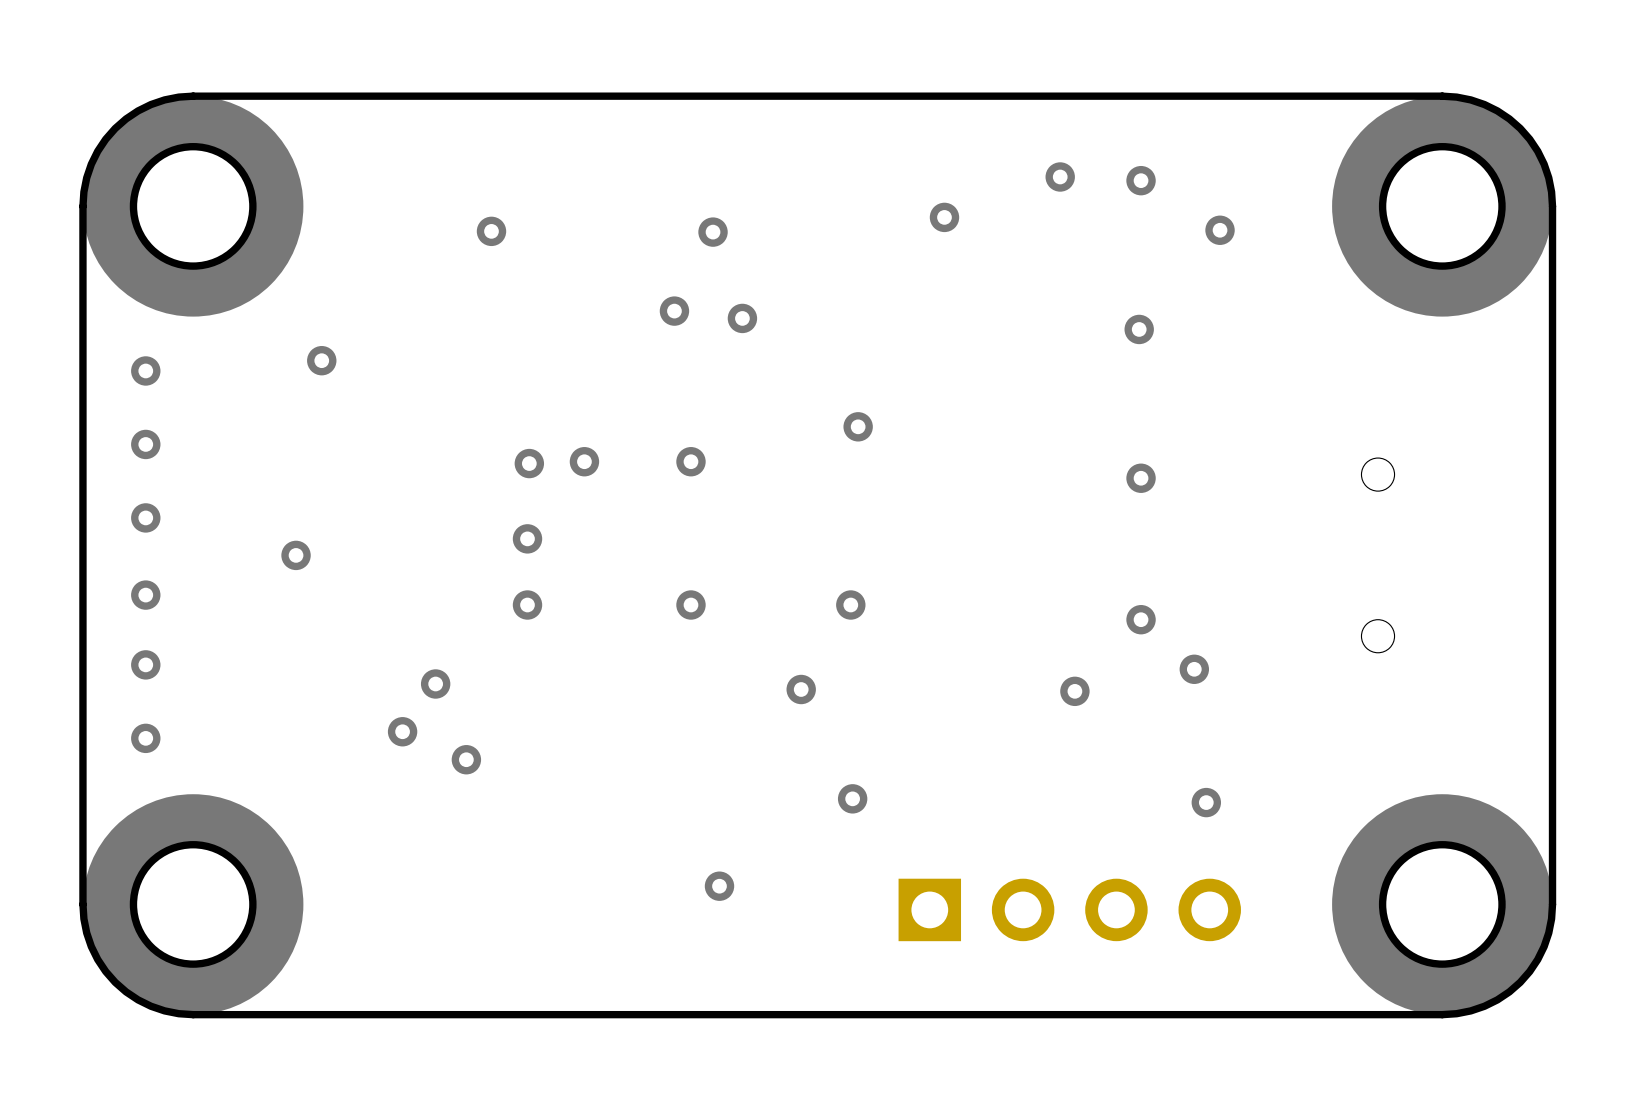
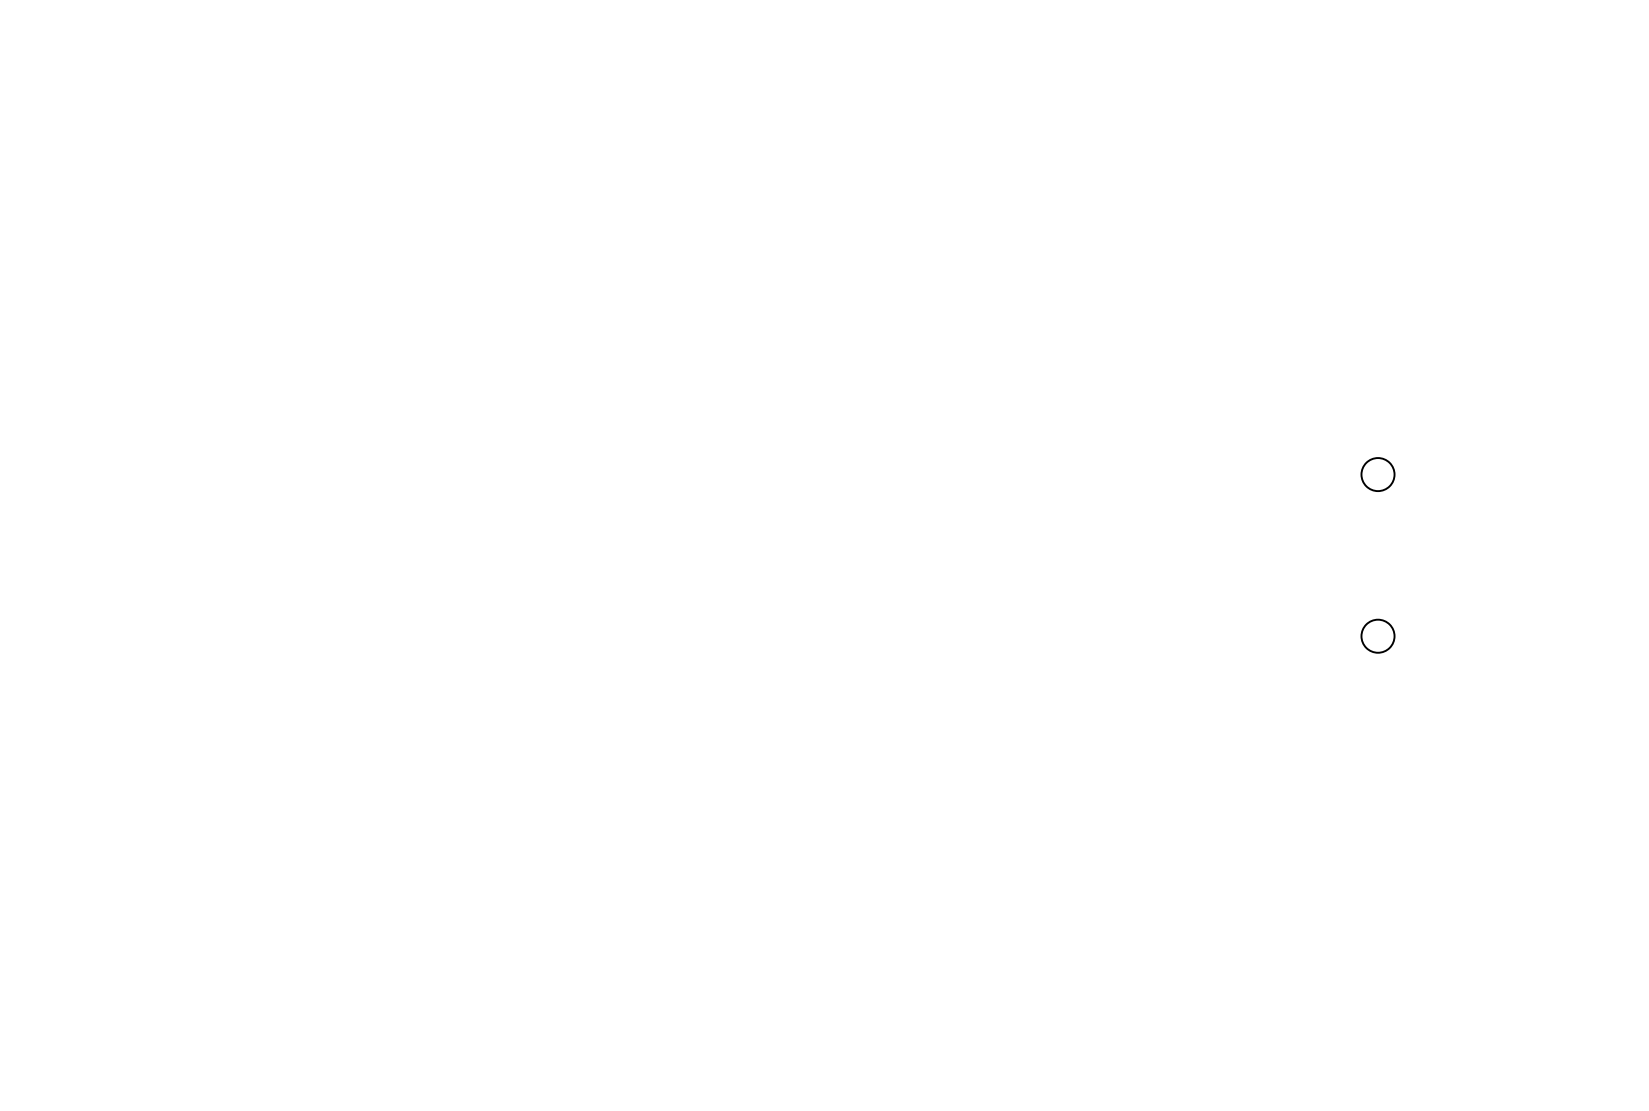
board edge: (1442, 96) (193, 96) (164, 99) (138, 110) (115, 128) (97, 151) (86, 177) (82, 206) (82, 904) (86, 932) (97, 959) (115, 982) (138, 999) (164, 1010) (193, 1014) (1442, 1014) (1470, 1010) (1497, 999) (1520, 982) (1537, 959) (1548, 932) (1551, 918) (1552, 206) (1551, 191) (1544, 164) (1537, 151) (1520, 128) (1509, 118) (1484, 104) (1470, 99) (1442, 96) -> none
round board edge: [129, 143, 257, 270] -> none
round board edge: [1378, 143, 1506, 270] -> none
via: (1060, 176) -> none
via: (1141, 180) -> none
via: (193, 206) -> none
via: (1442, 206) -> none
via: (944, 217) -> none
via: (1220, 230) -> none
via: (491, 231) -> none
via: (713, 232) -> none
via: (674, 311) -> none
via: (742, 318) -> none
via: (1139, 329) -> none
via: (321, 360) -> none
via: (145, 370) -> none
via: (858, 426) -> none
via: (145, 444) -> none
via: (584, 461) -> none
via: (690, 461) -> none
via: (529, 463) -> none
via: (1141, 478) -> none
via: (145, 517) -> none
via: (527, 538) -> none
via: (296, 555) -> none
via: (145, 595) -> none
via: (527, 605) -> none
via: (690, 605) -> none
via: (850, 605) -> none
via: (1141, 619) -> none
via: (145, 664) -> none
via: (1194, 669) -> none
via: (435, 683) -> none
via: (801, 689) -> none
via: (1074, 691) -> none
via: (402, 731) -> none
via: (145, 738) -> none
via: (466, 759) -> none
via: (852, 798) -> none
via: (1206, 802) -> none
round board edge: [129, 841, 257, 968] -> none
round board edge: [1378, 841, 1506, 968] -> none
via: (719, 886) -> none
via: (193, 904) -> none
via: (1442, 904) -> none
part: (1069, 909) -> none

